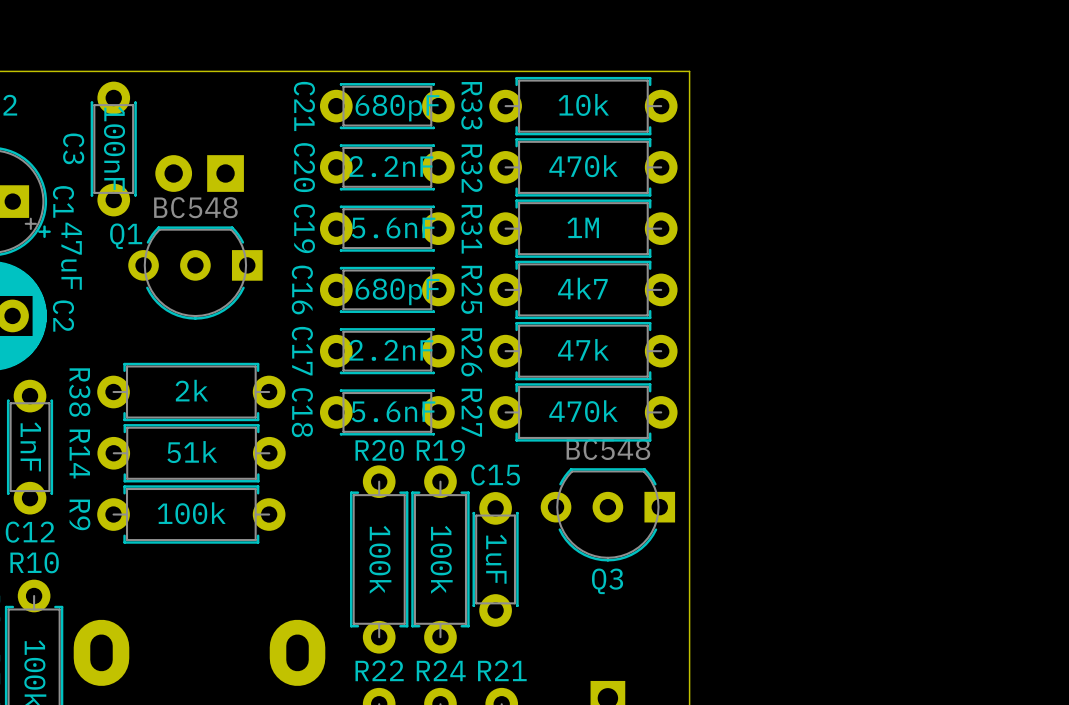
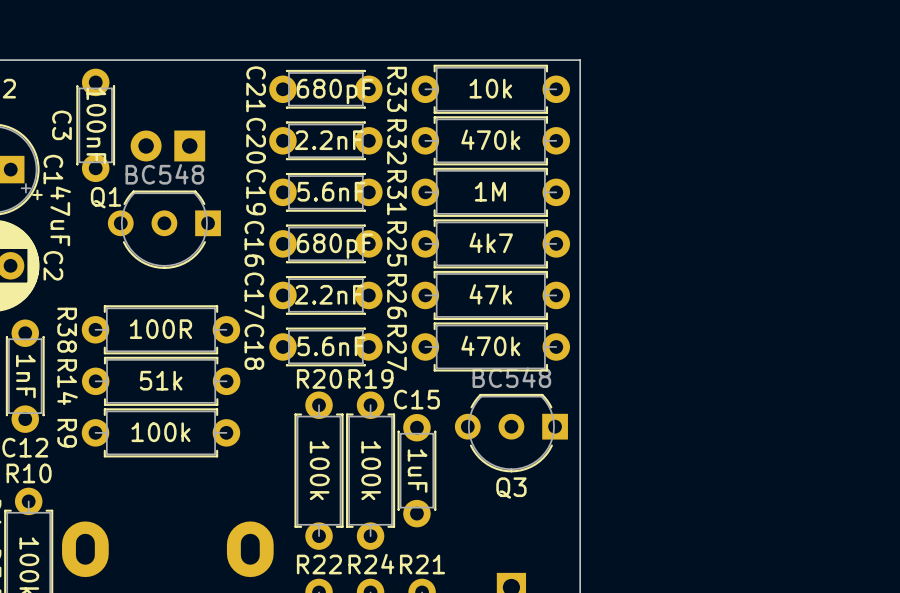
R38 value: 2k (191, 390) -> 100R (160, 329)

